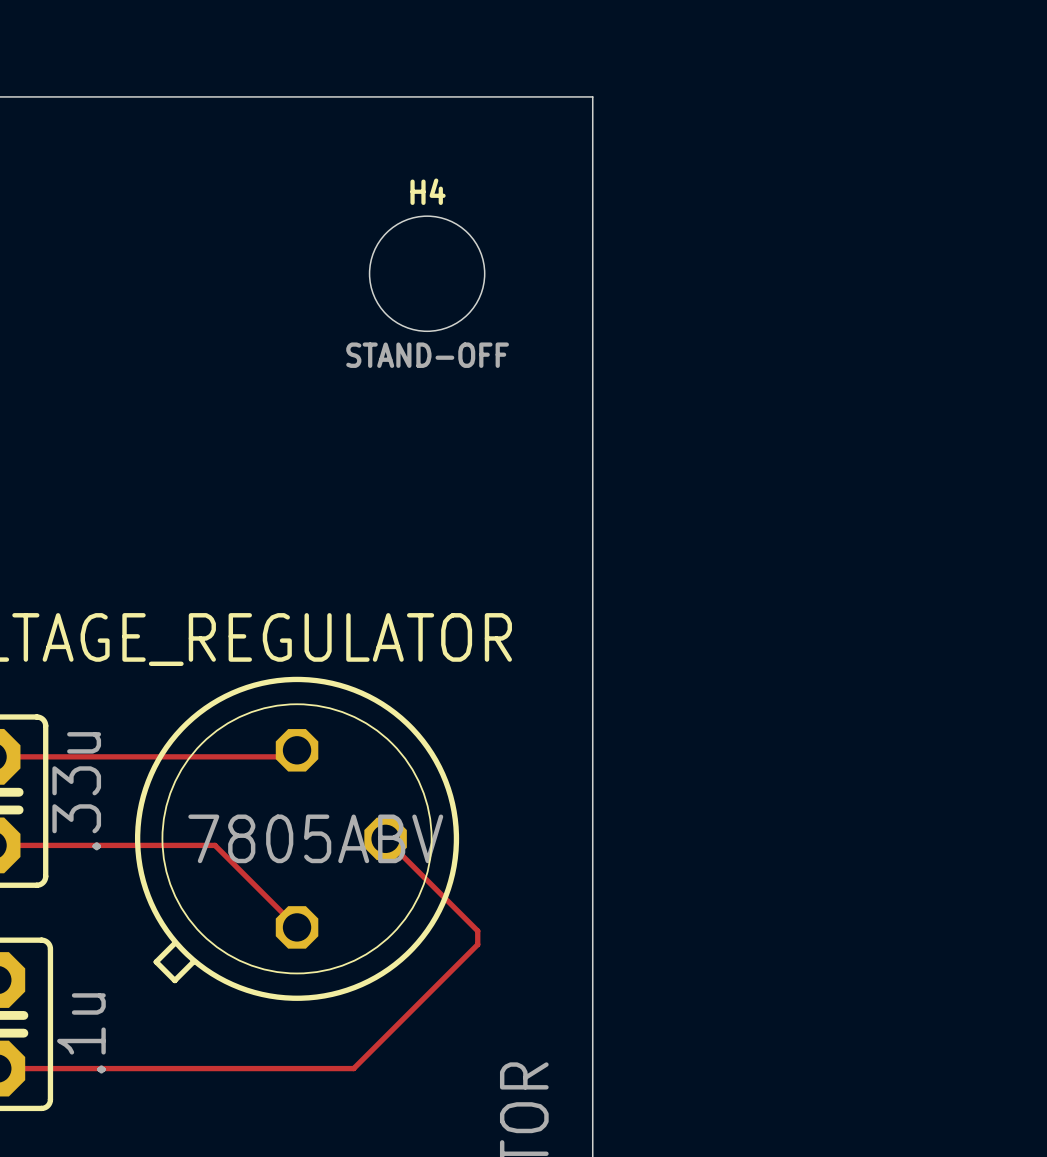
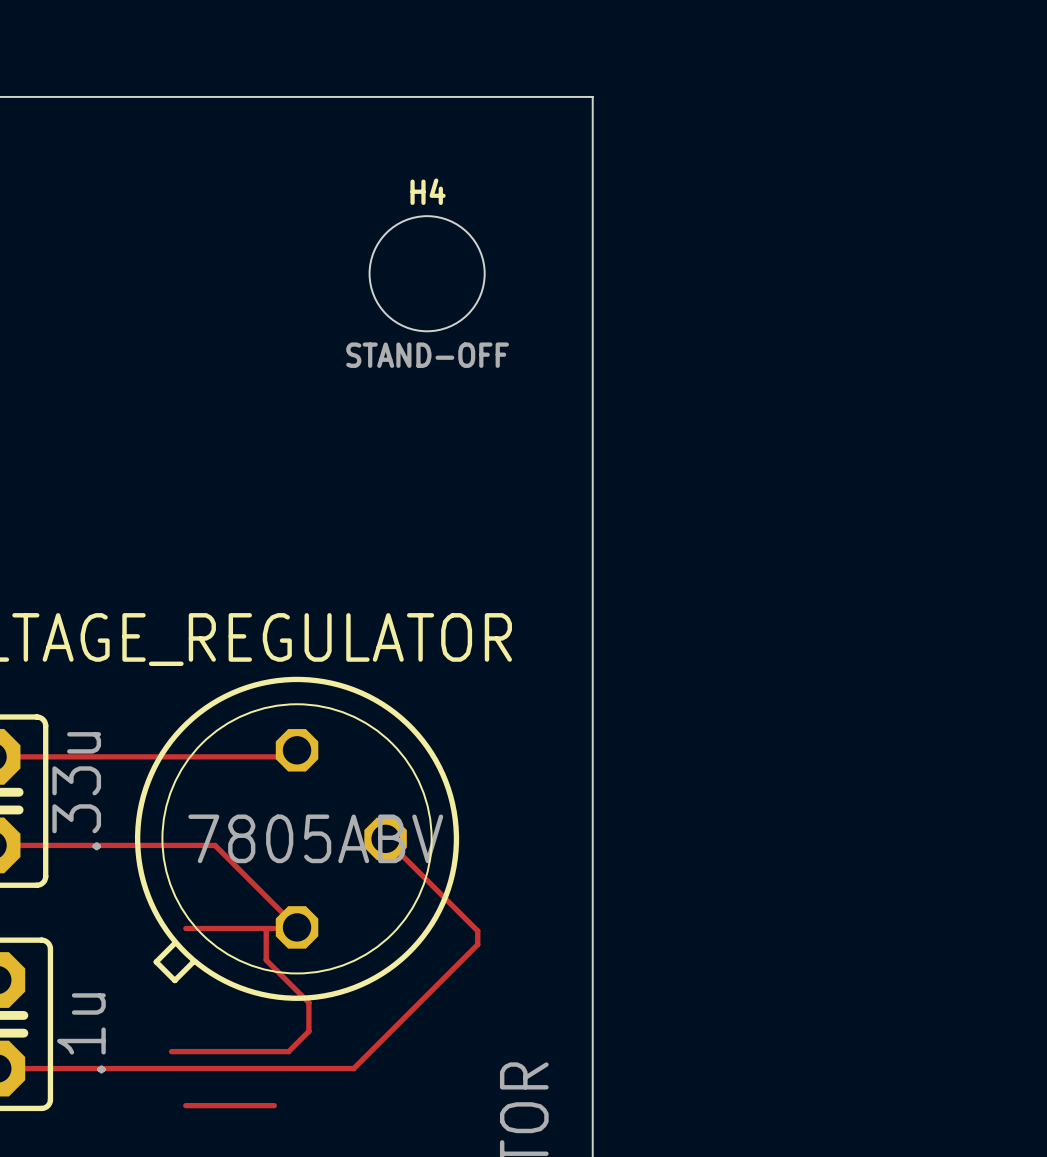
track: none -> (185, 928) (274, 928)
track: none -> (266, 928) (266, 960) (308, 1002) (308, 1031) (288, 1051) (171, 1051)
track: none -> (185, 1105) (274, 1105)

